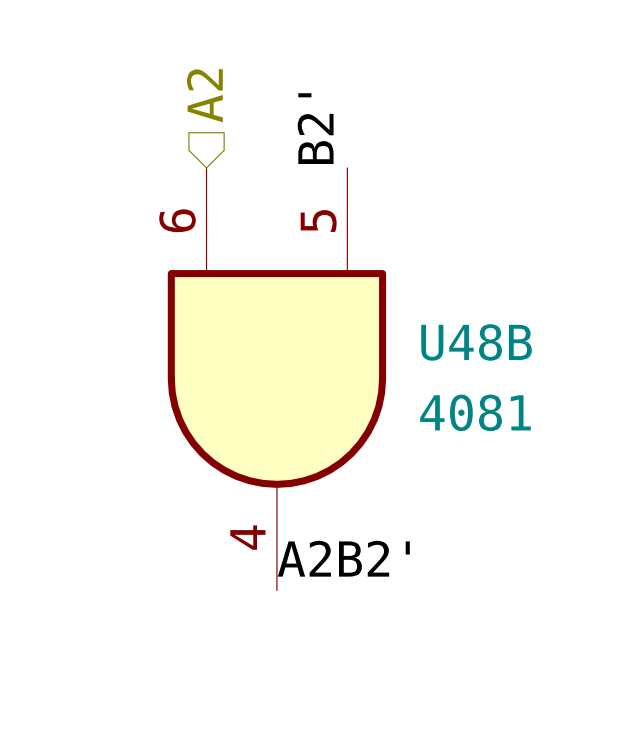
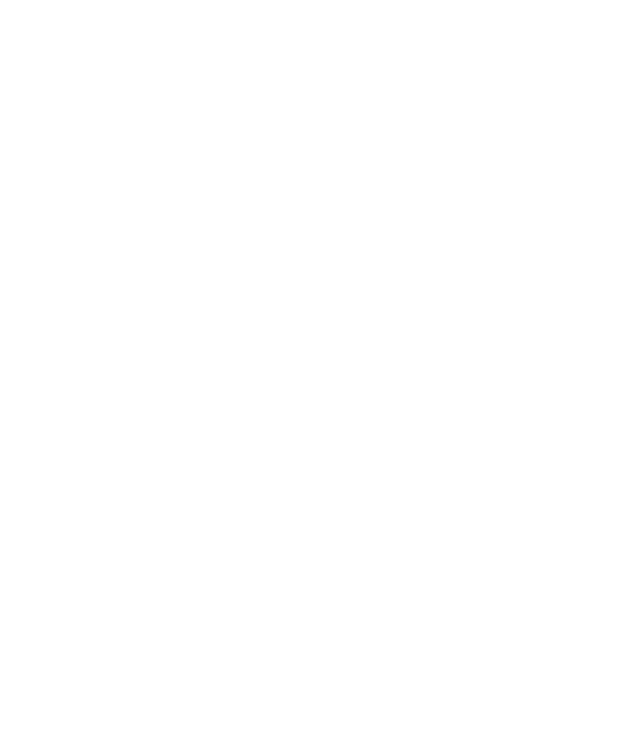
hierarchical label: A2 (204, 95) -> none
label: B2' (315, 128) -> none
U48B: 4081 (276, 379) -> none
label: A2B2' (343, 558) -> none

